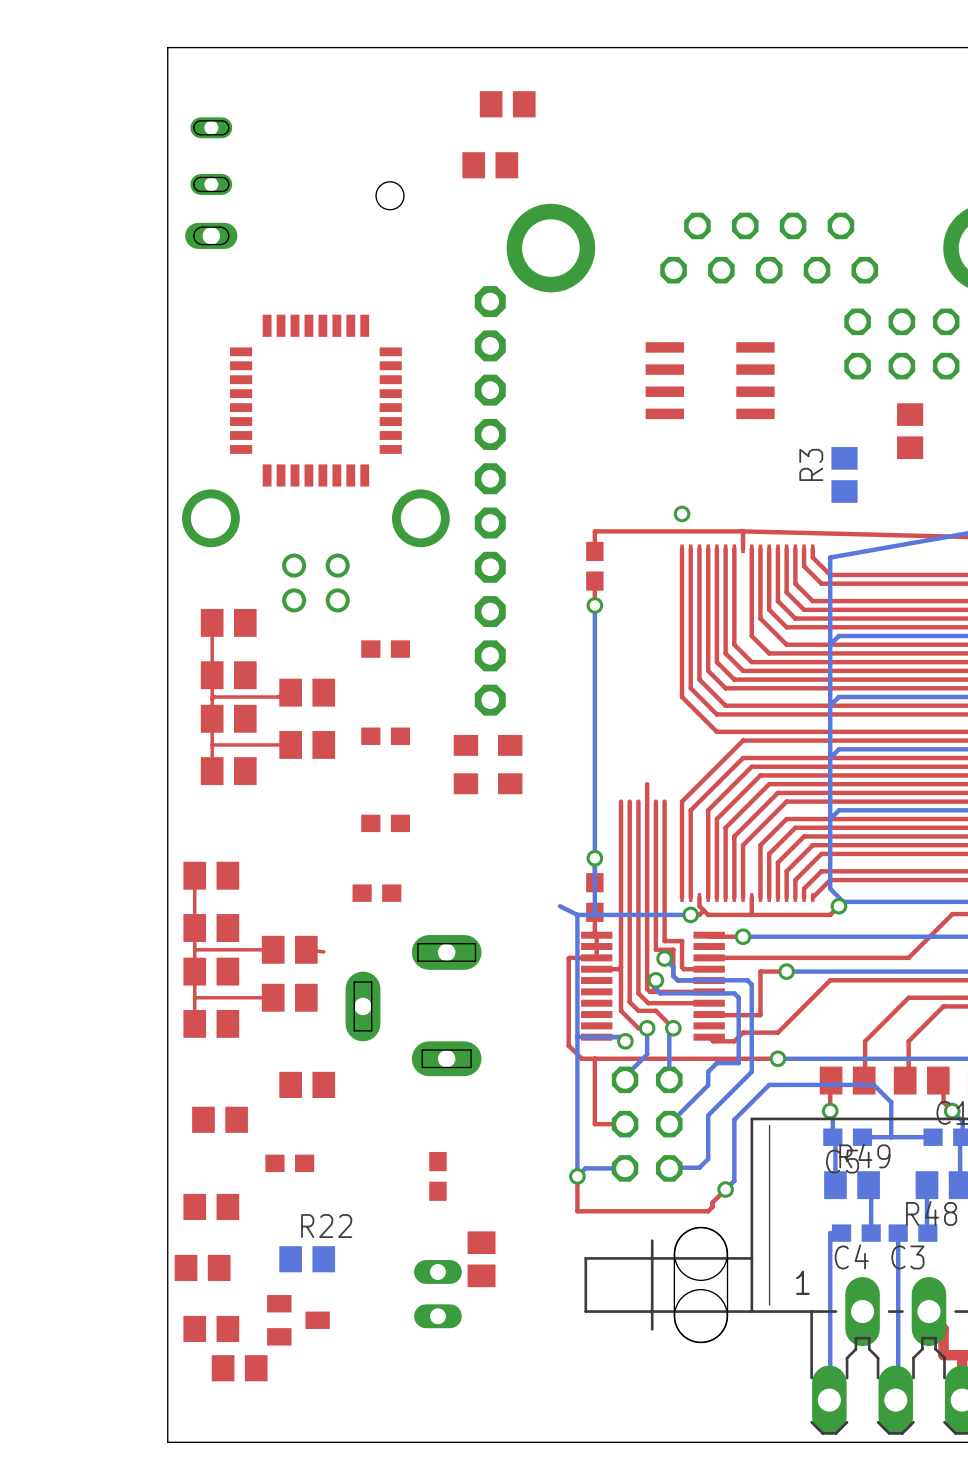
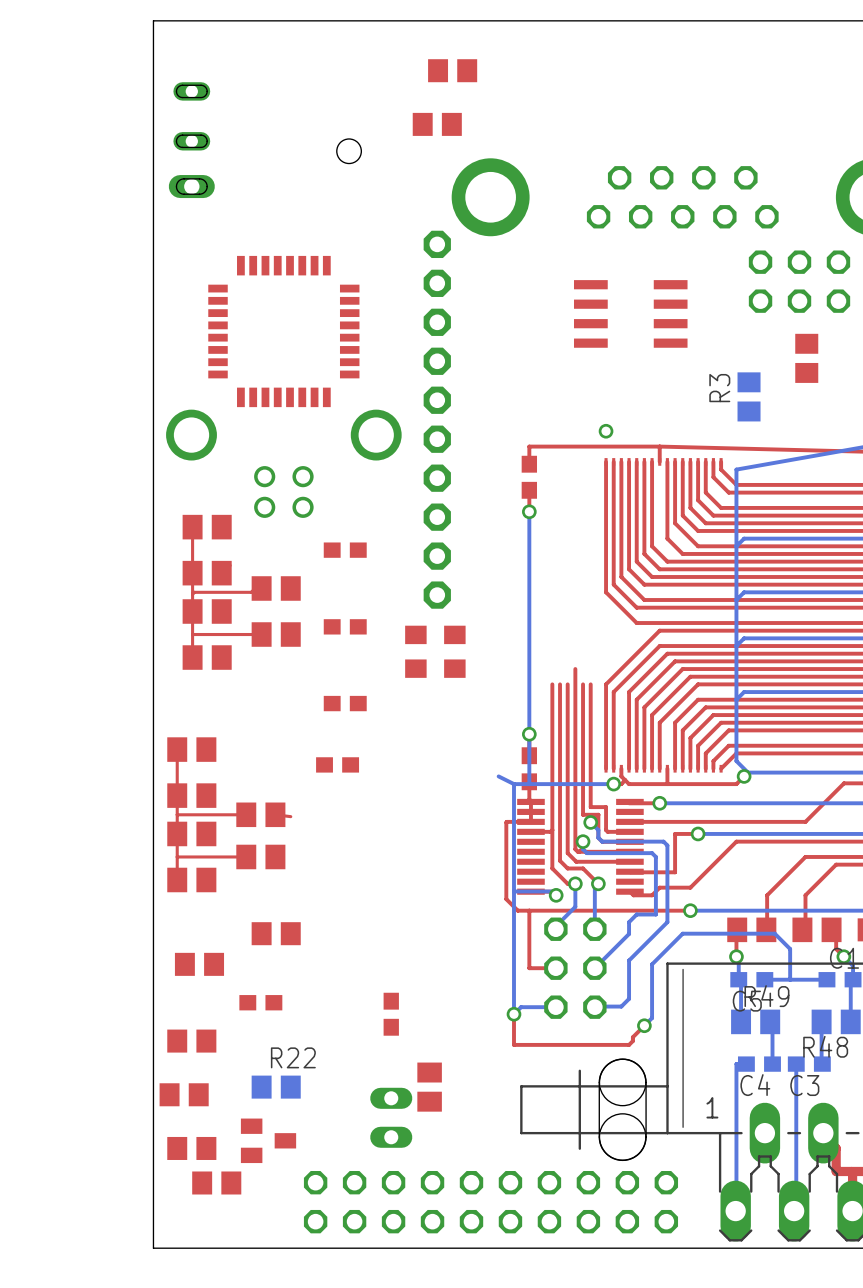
part: (413, 1005) -> none
part: none -> (490, 1202)

